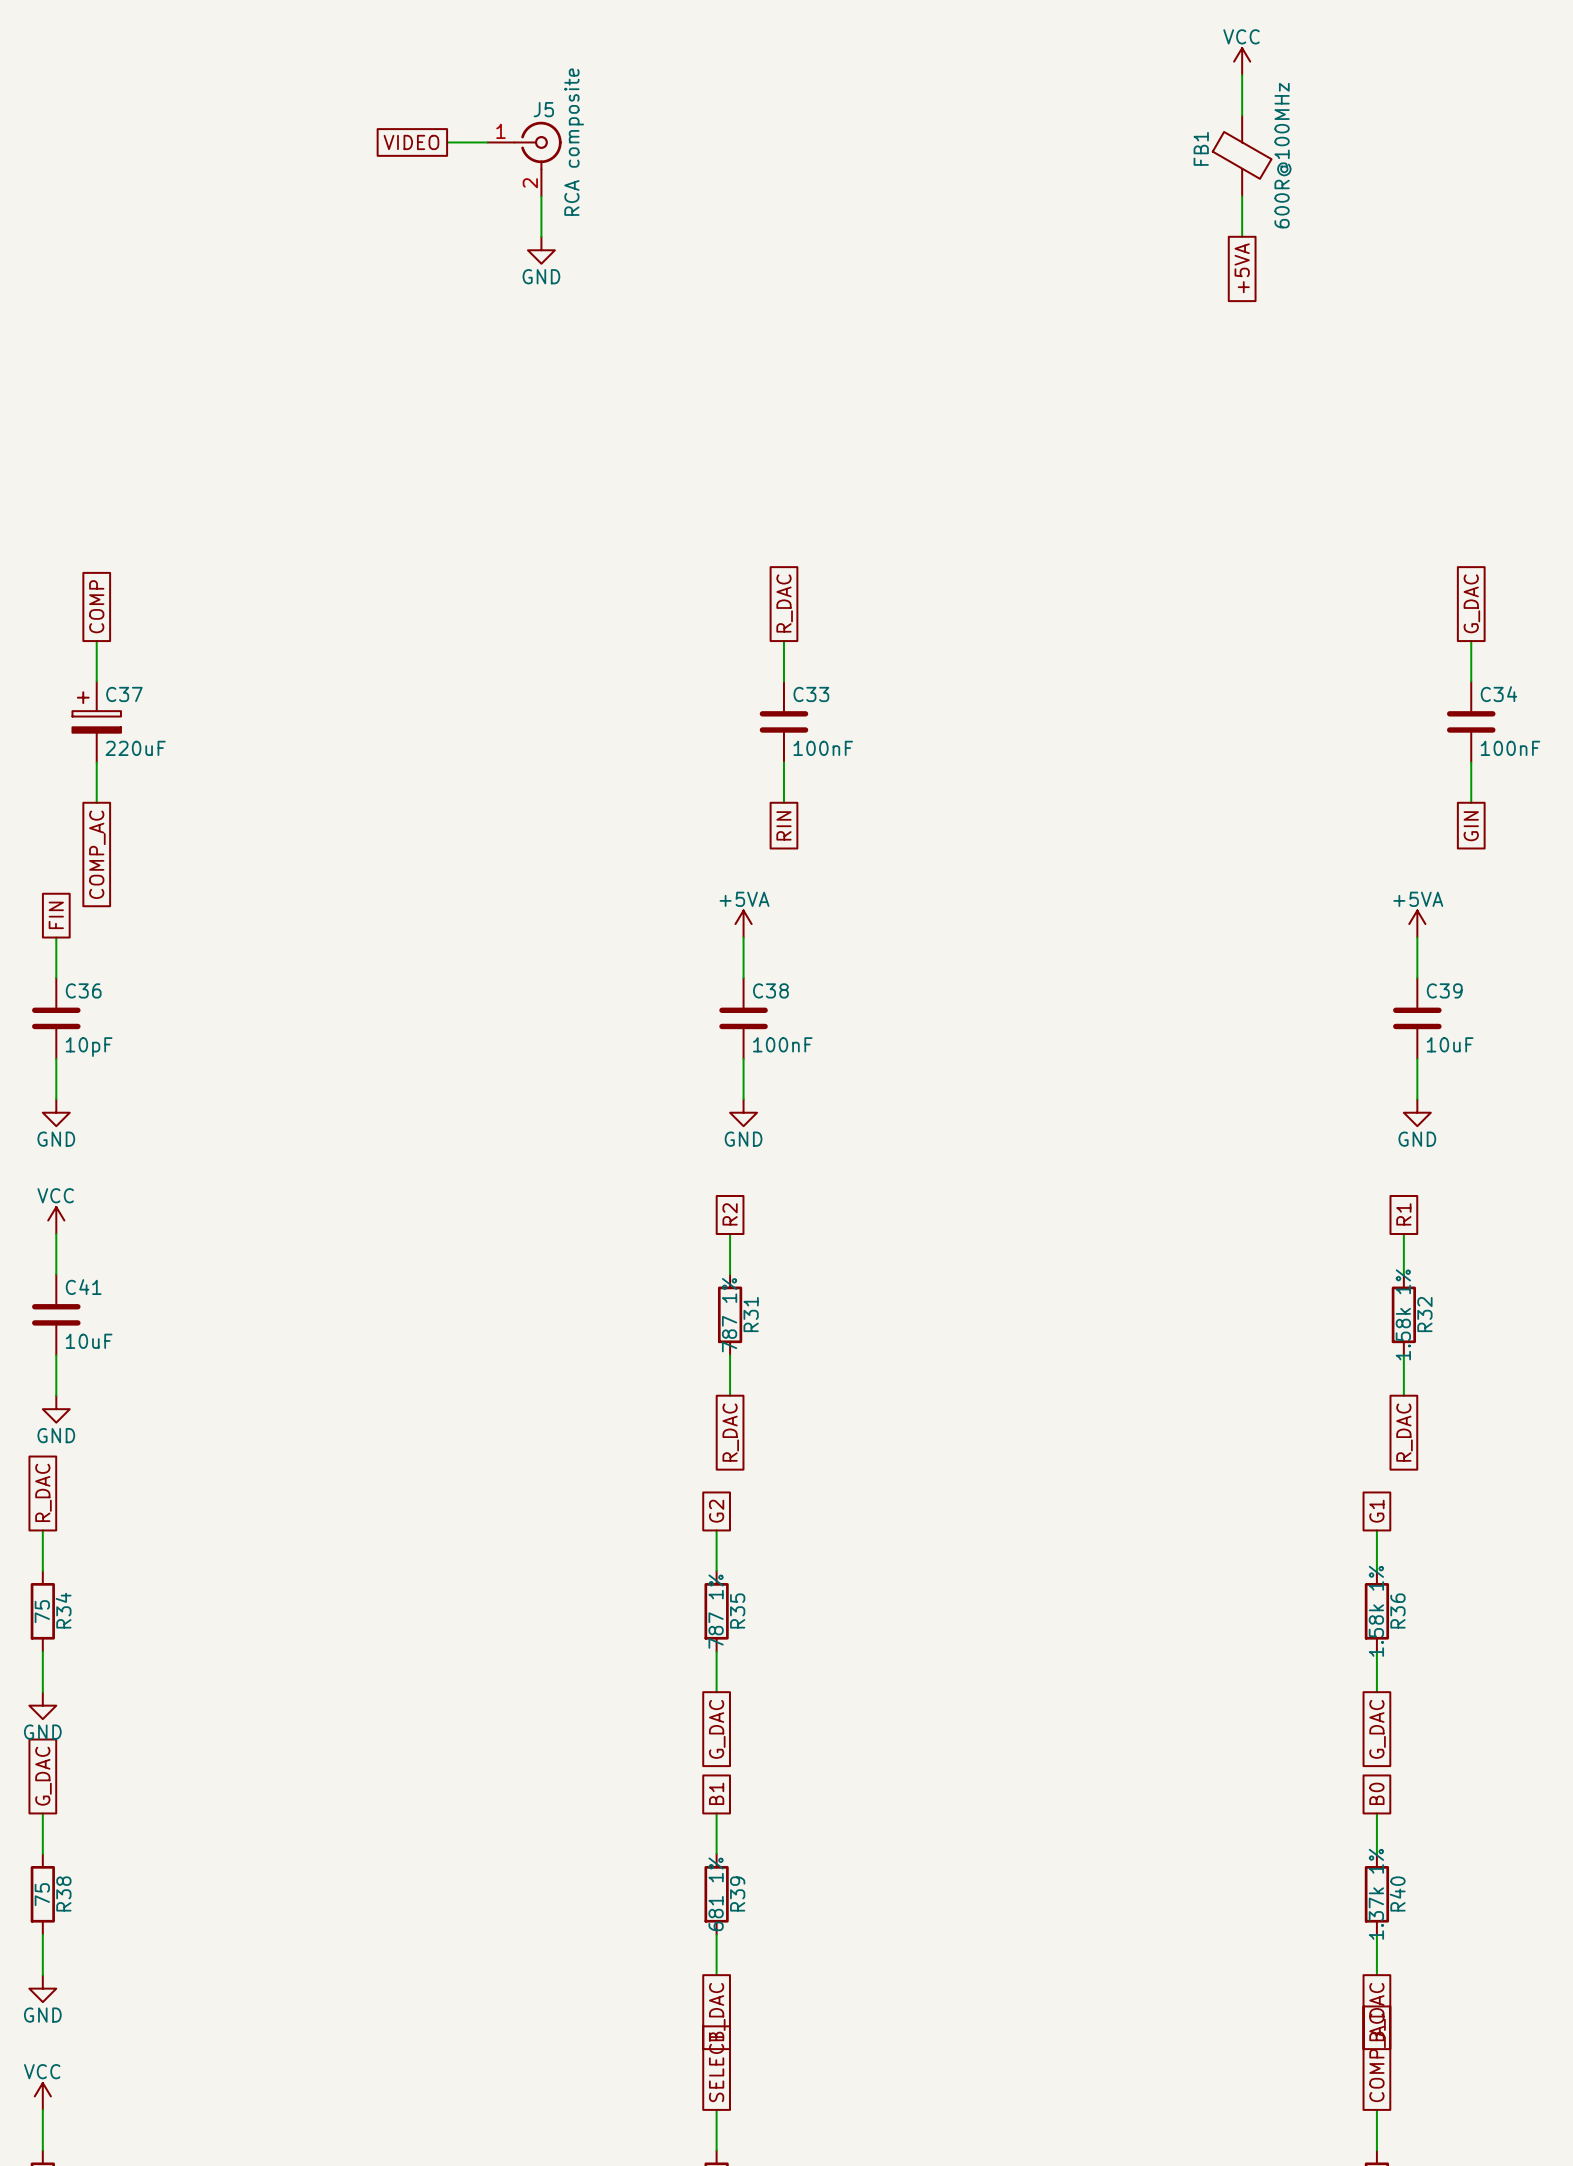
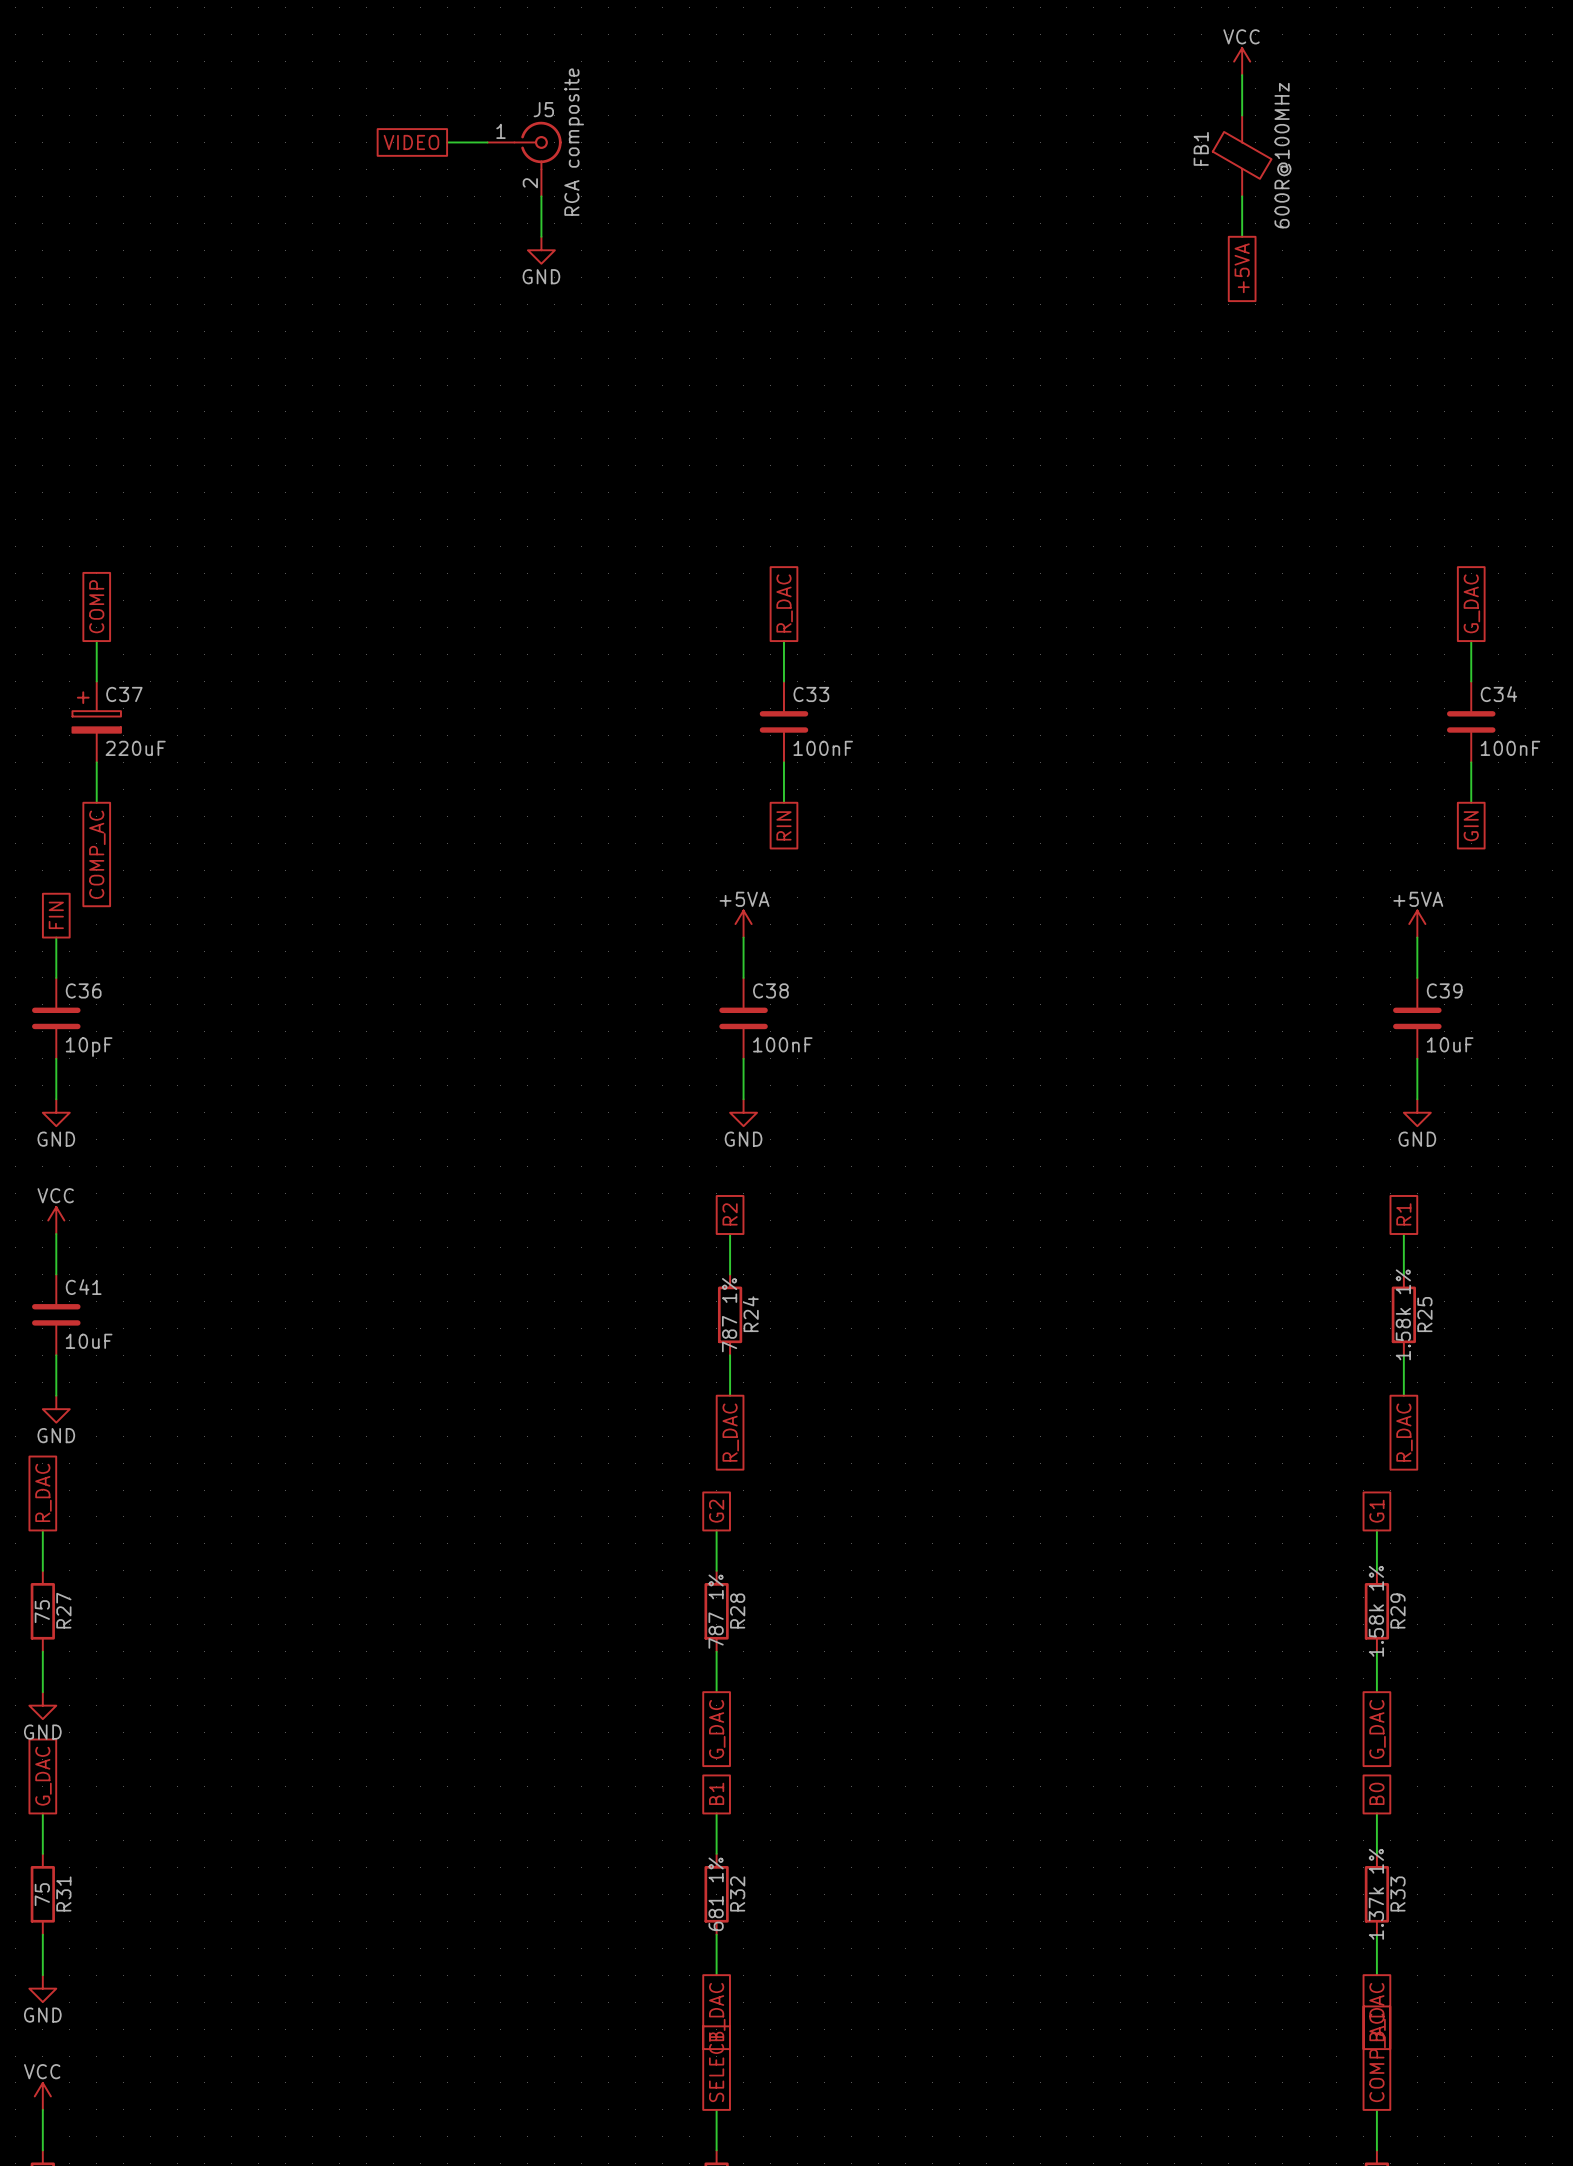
R31 name: R31 (751, 1314) -> R24 (750, 1314)
R32 name: R32 (1424, 1314) -> R25 (1424, 1314)
R34 name: R34 (63, 1610) -> R27 (63, 1610)
R35 name: R35 (737, 1610) -> R28 (737, 1610)
R36 name: R36 (1397, 1610) -> R29 (1397, 1610)
R38 name: R38 (63, 1893) -> R31 (63, 1893)
R39 name: R39 (737, 1893) -> R32 (737, 1893)
R40 name: R40 (1397, 1893) -> R33 (1397, 1893)

